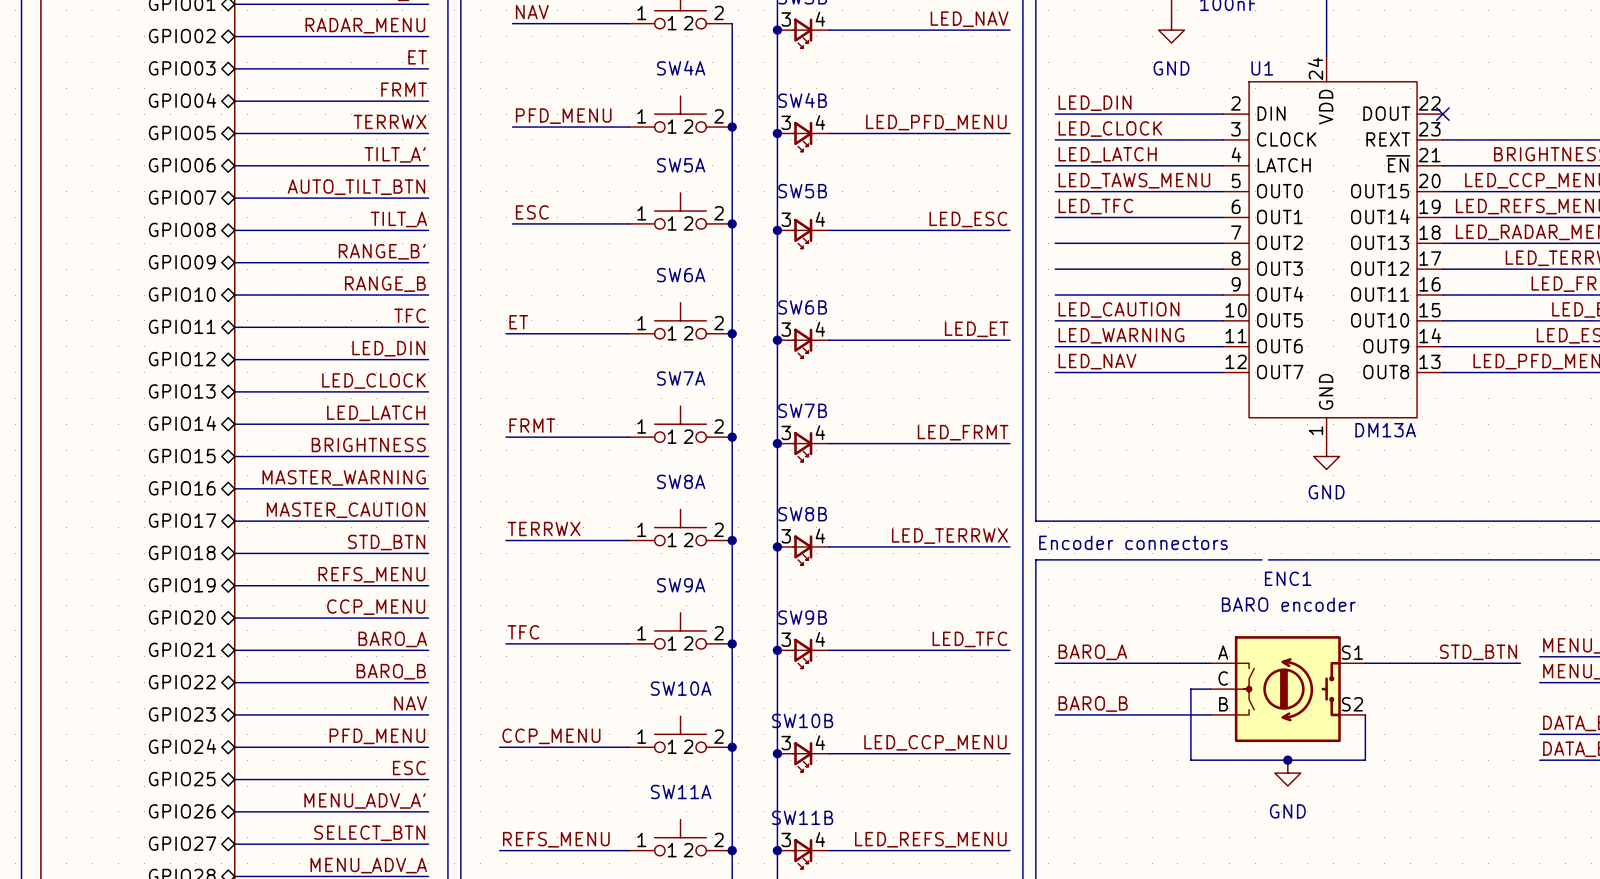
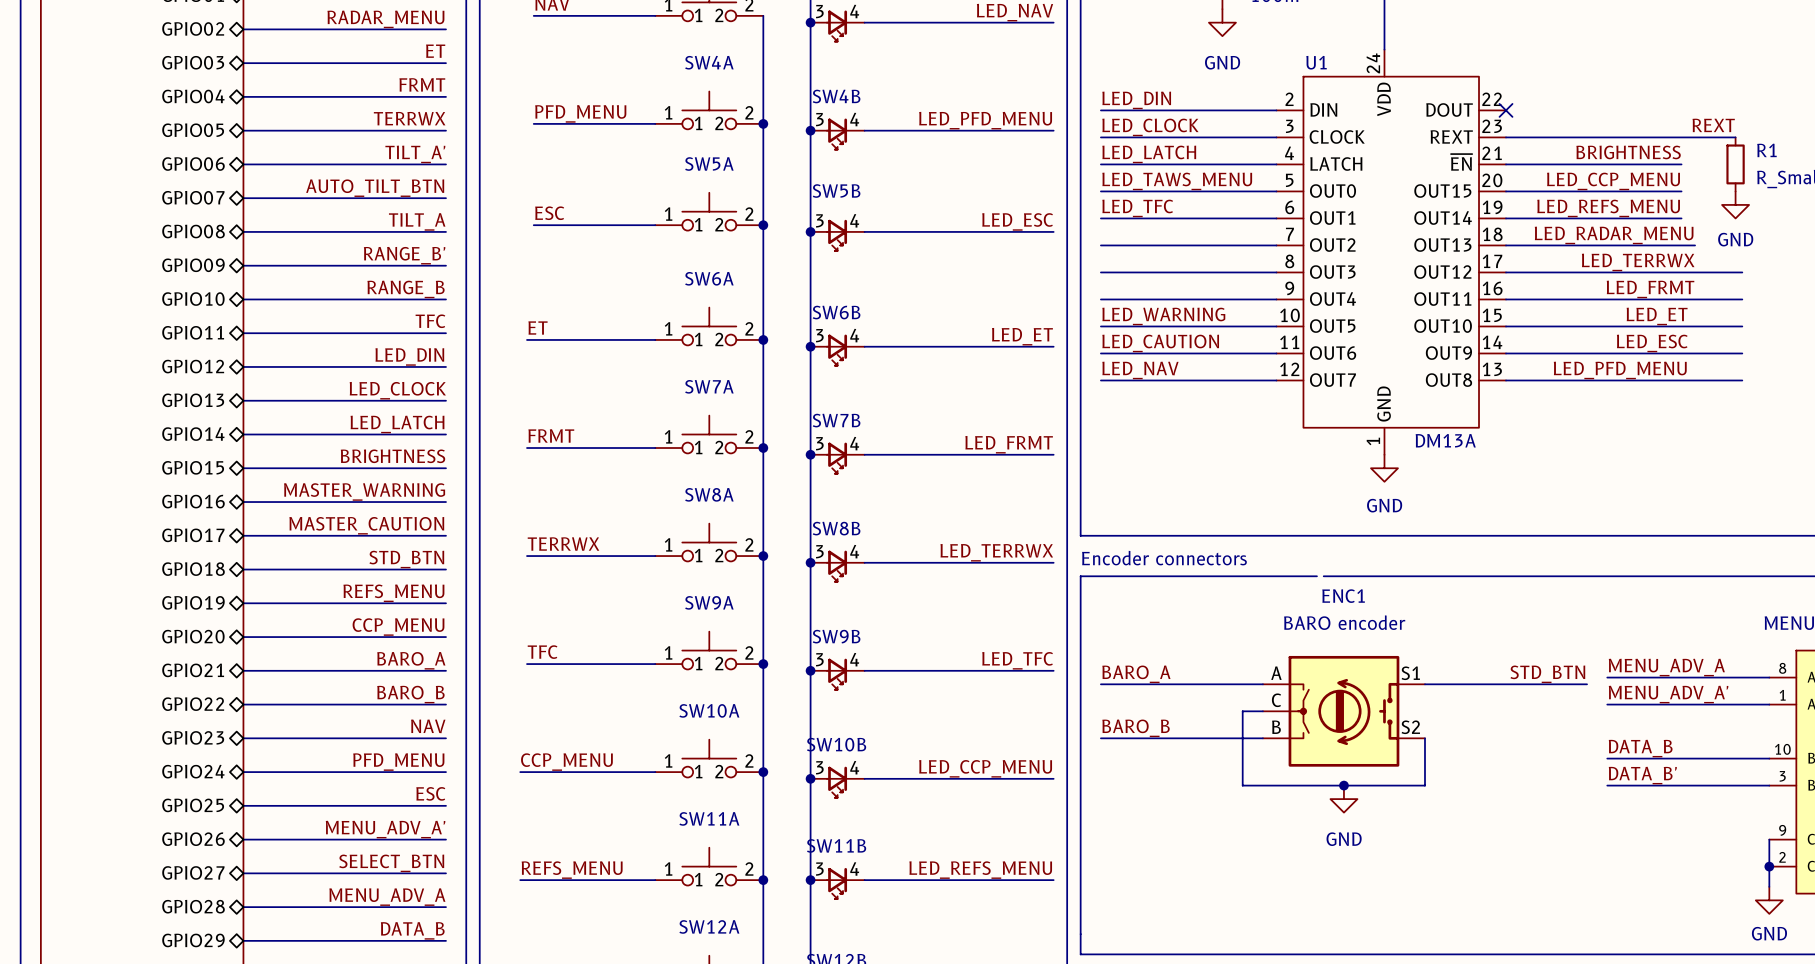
label: LED_CAUTION (1119, 309) -> LED_WARNING (1163, 316)
label: LED_WARNING (1121, 335) -> LED_CAUTION (1160, 343)

